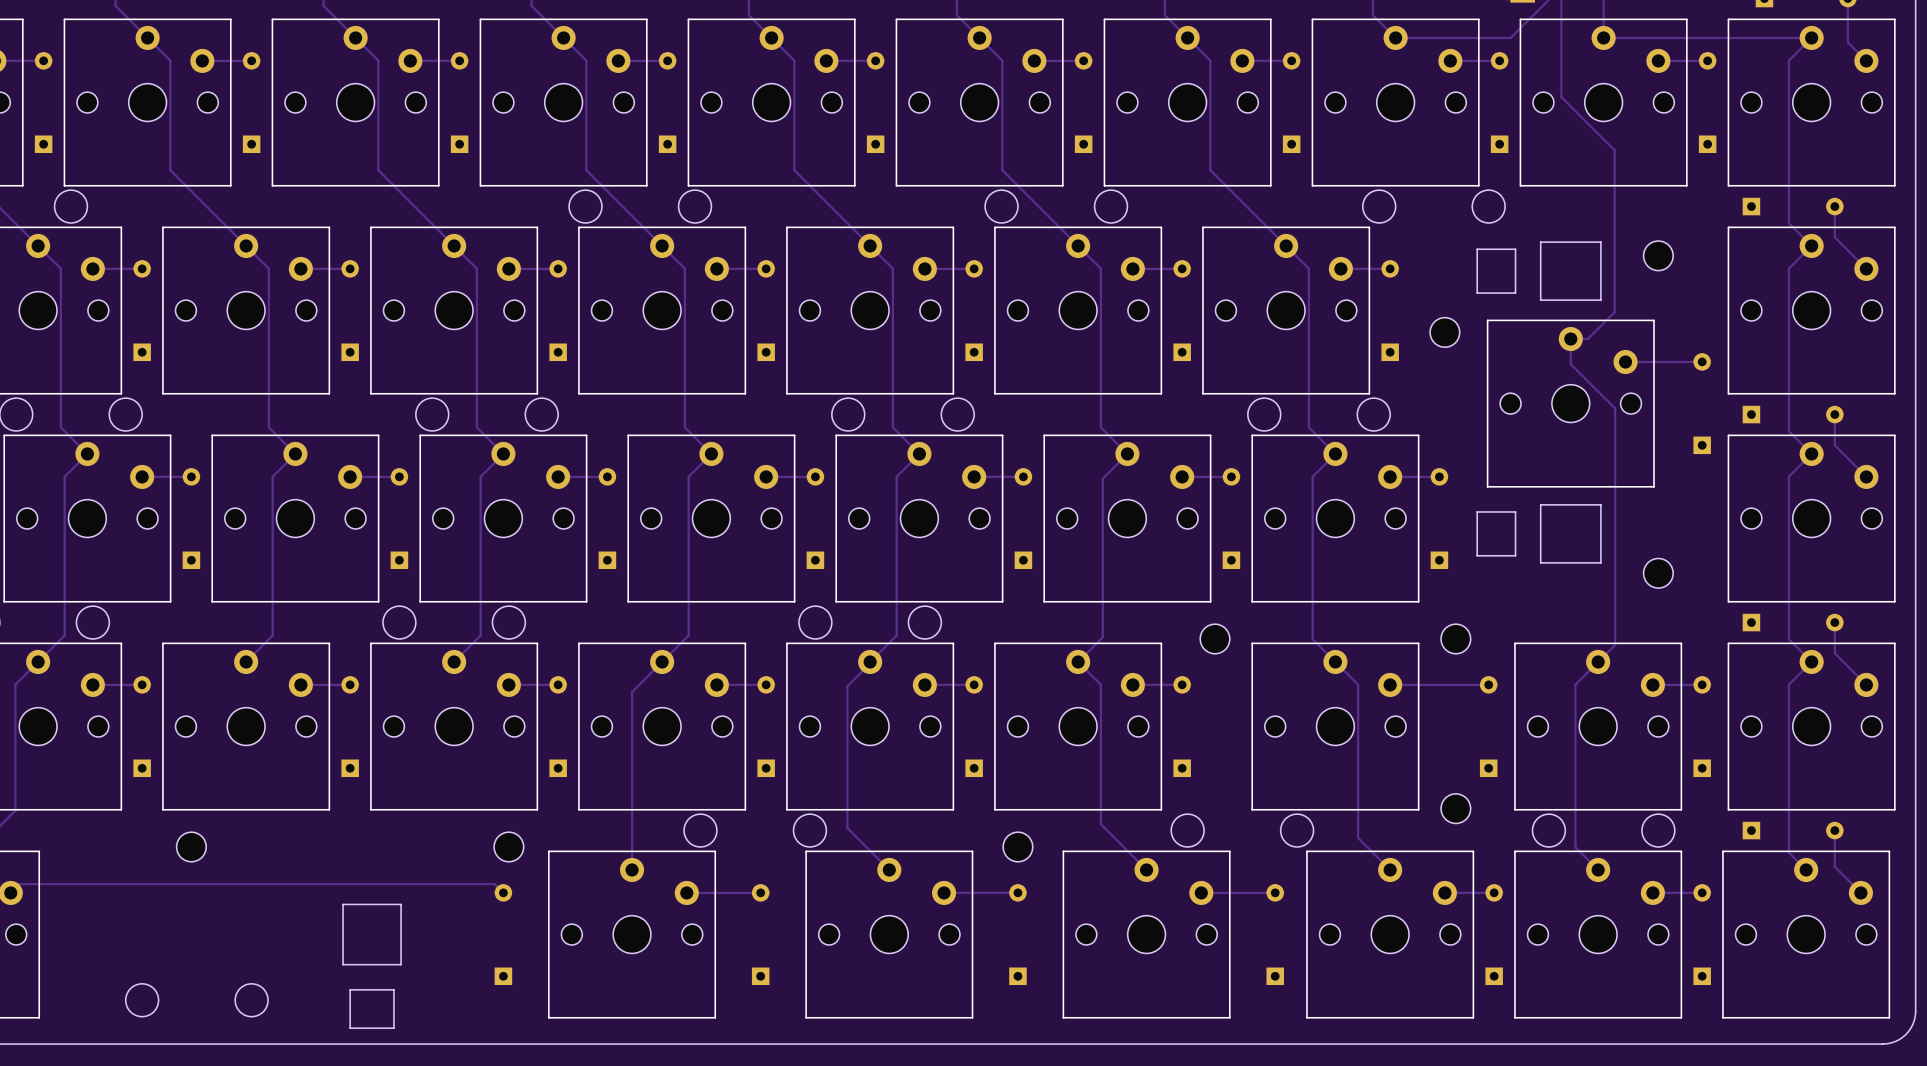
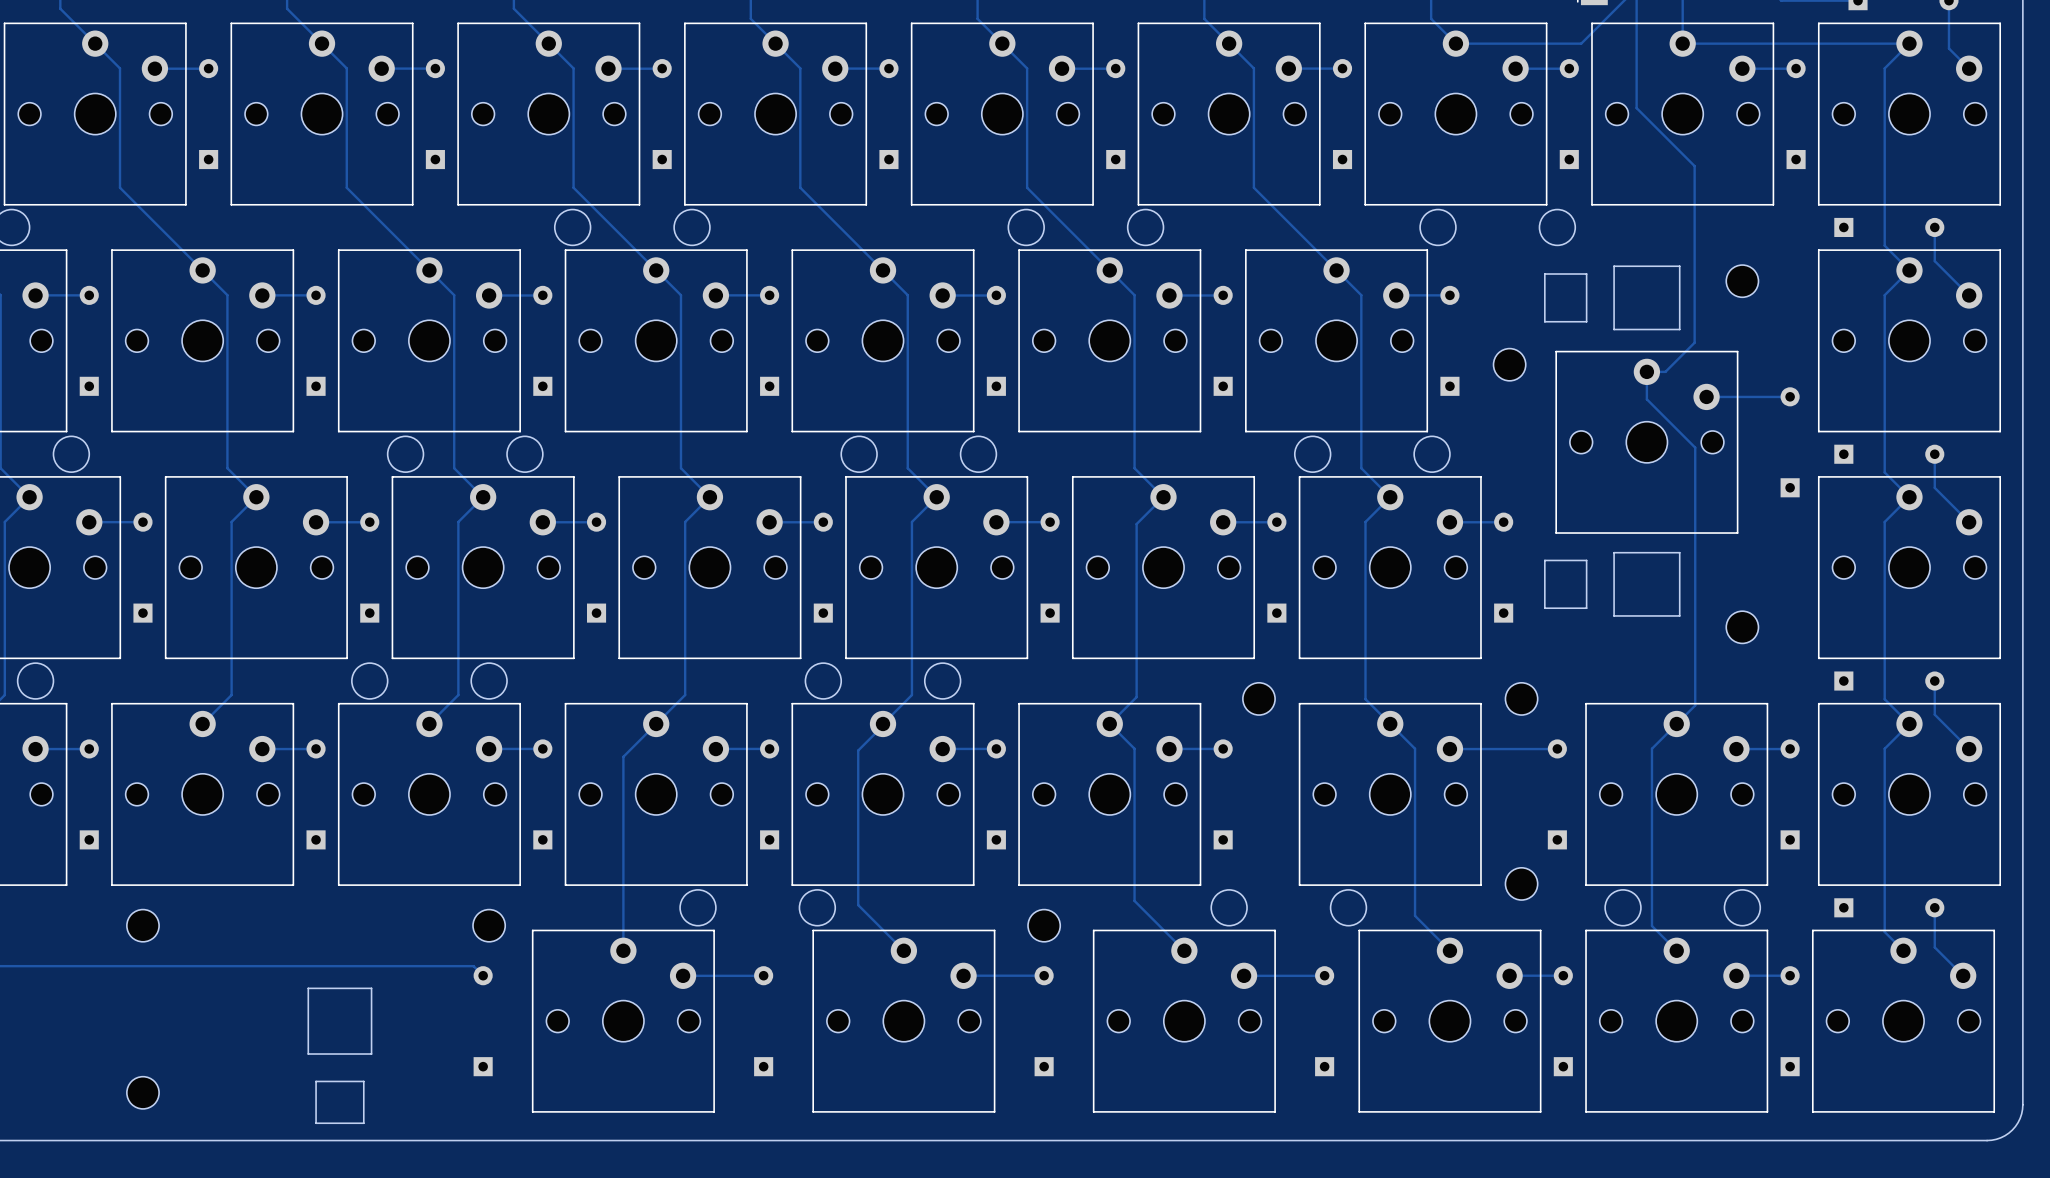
drawing: [125, 983, 269, 1017] -> none
part: none -> (142, 1092)

